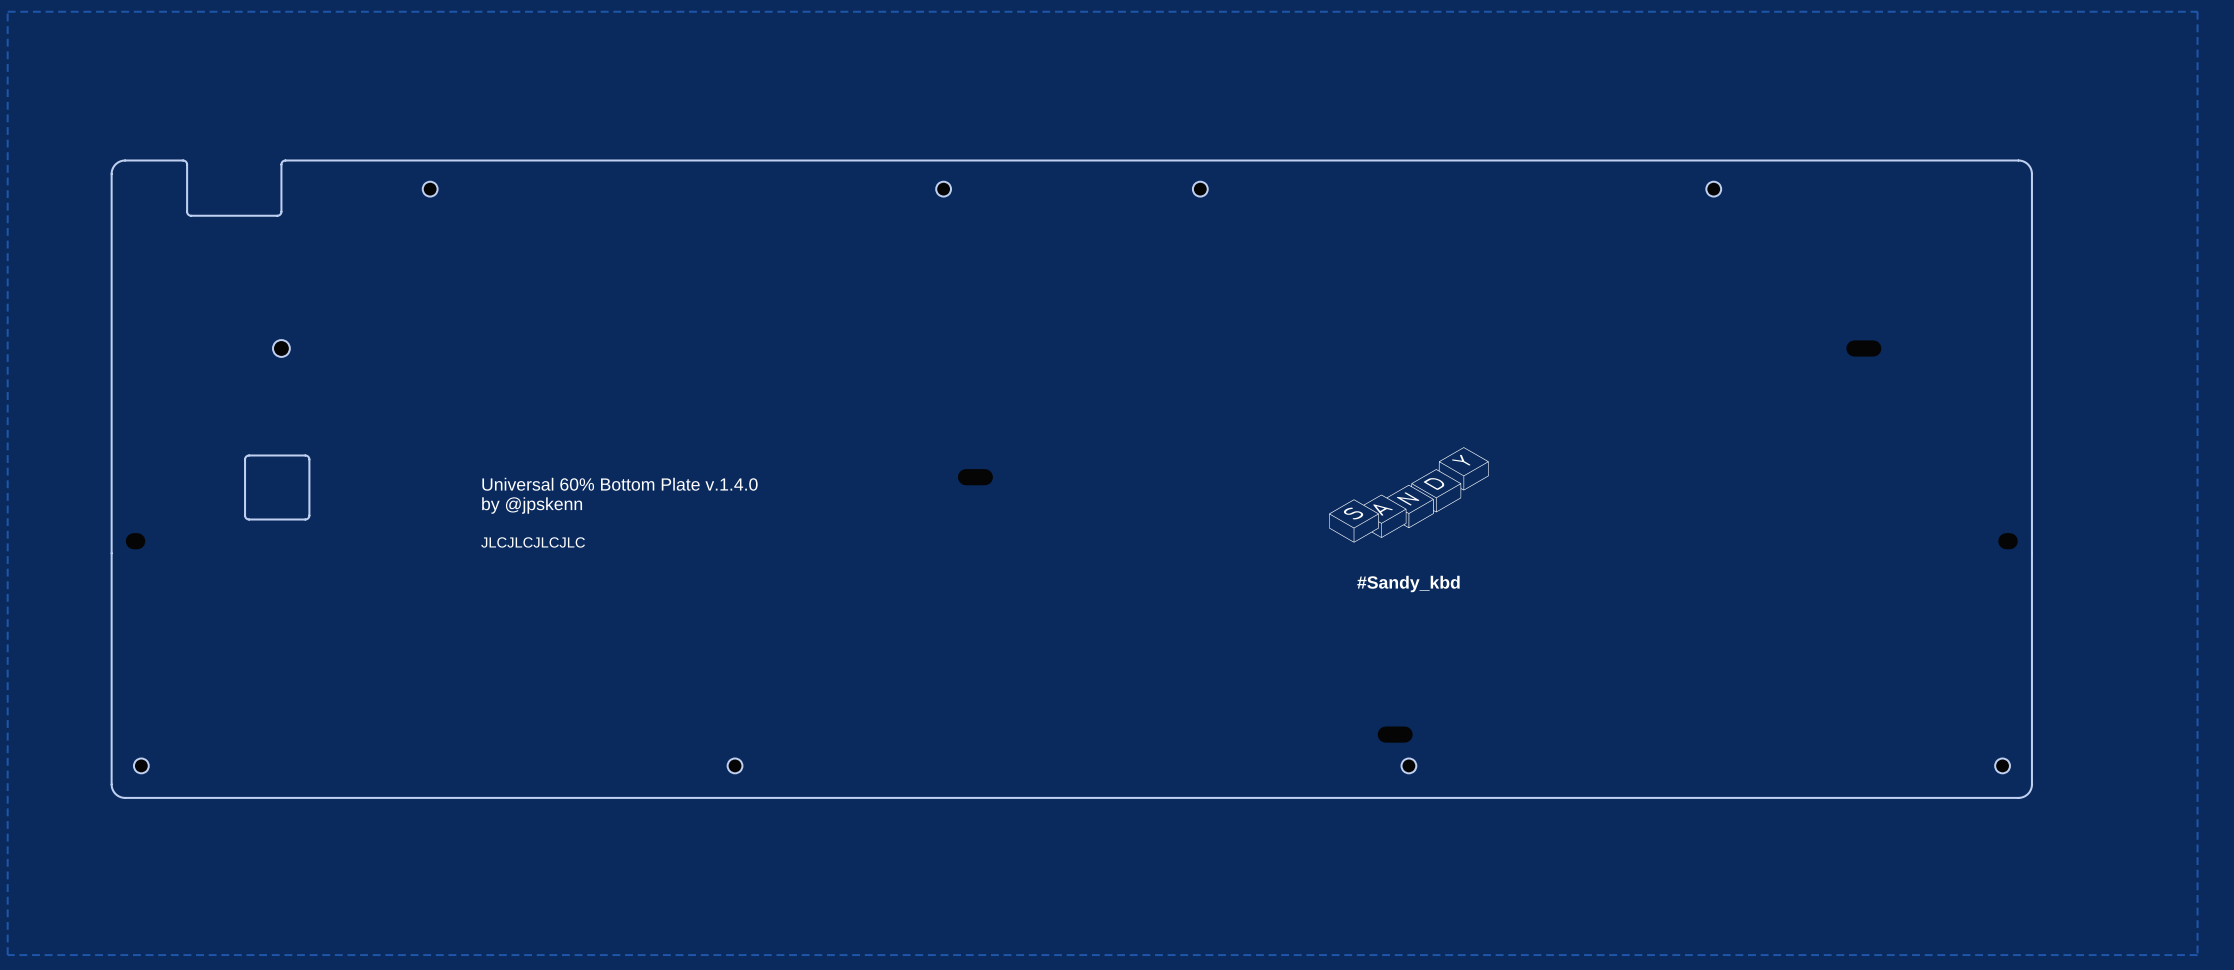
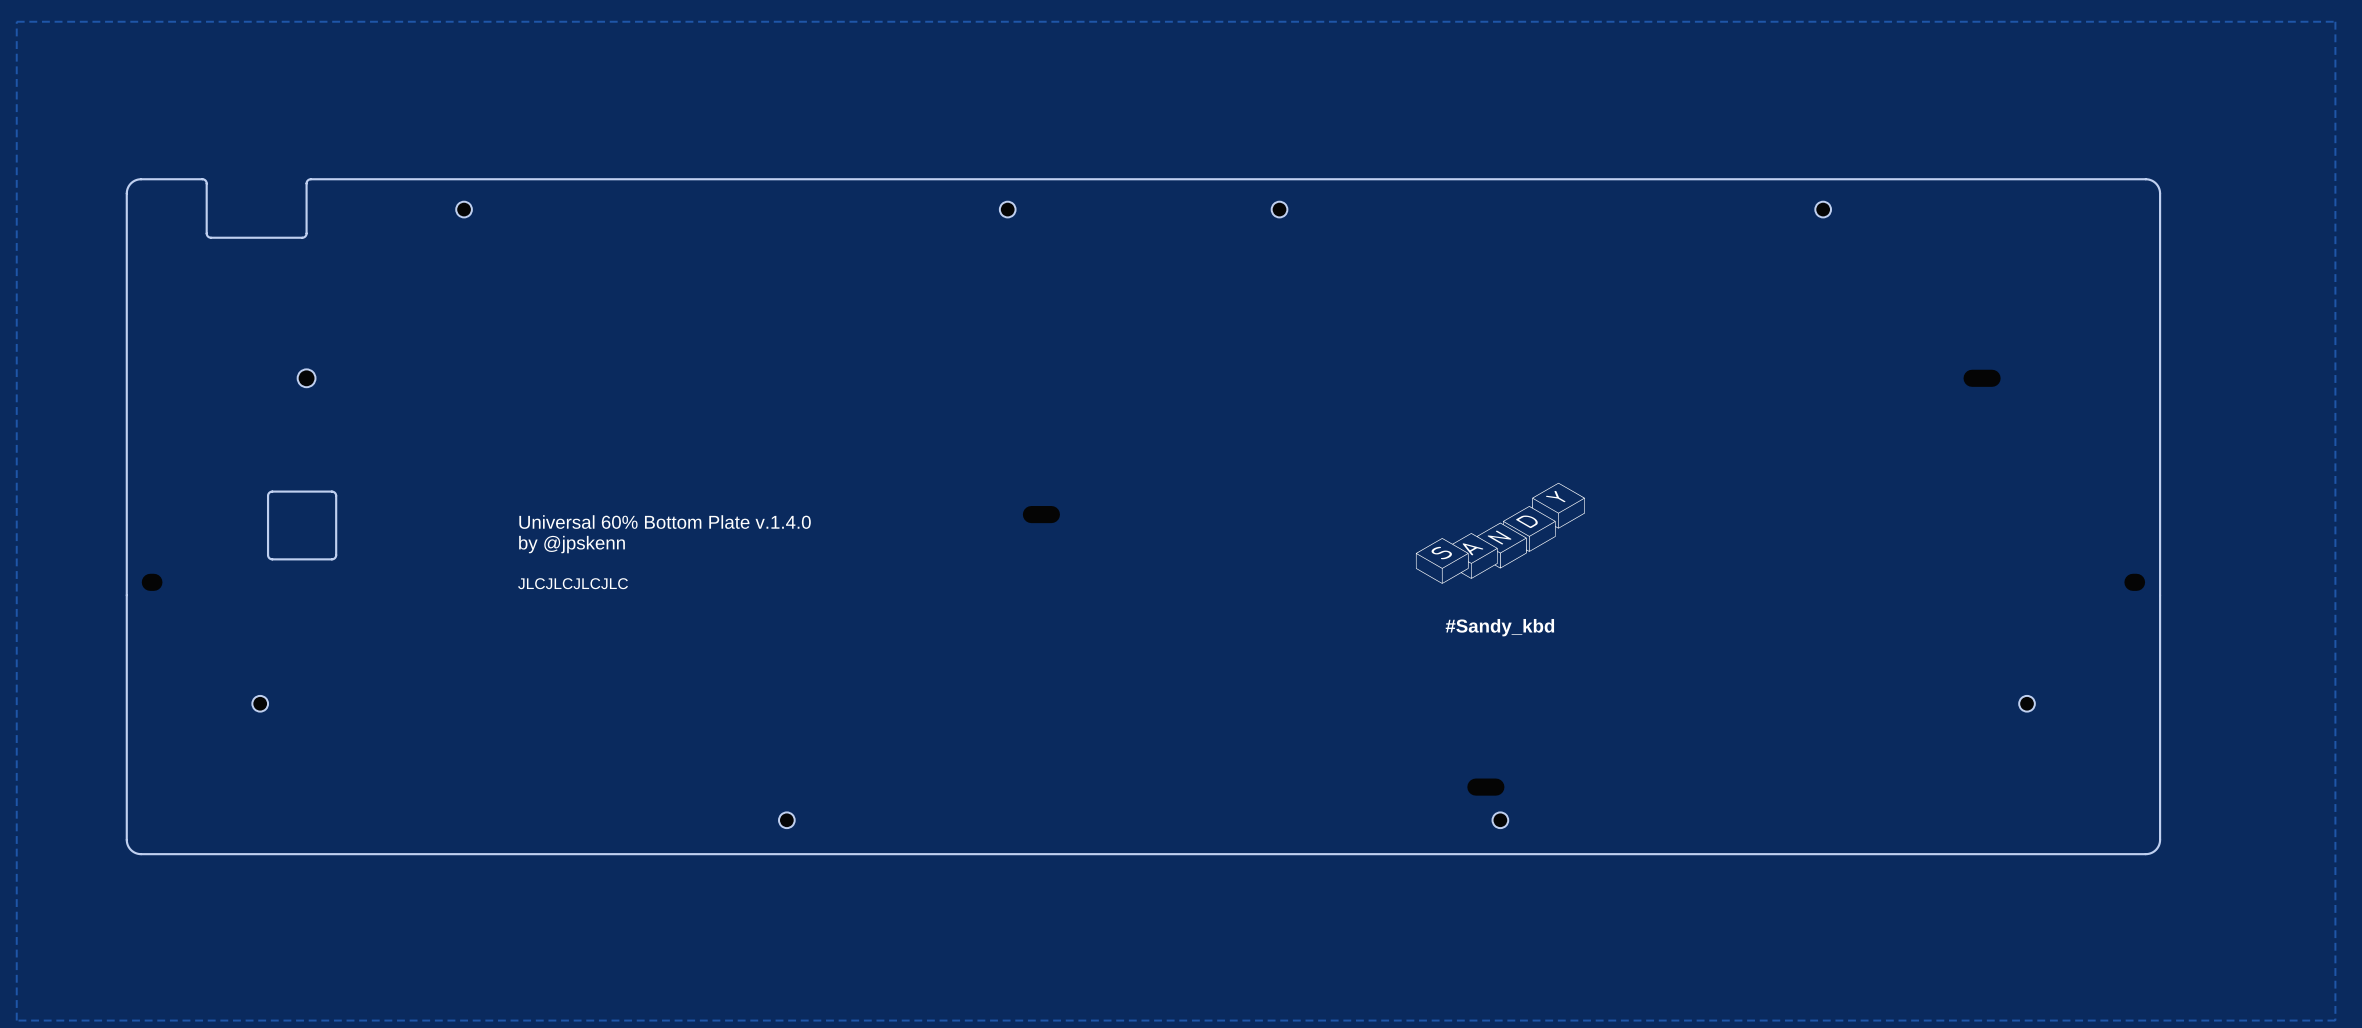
part position: (141, 765) -> (260, 703)
part position: (2002, 765) -> (2027, 703)

